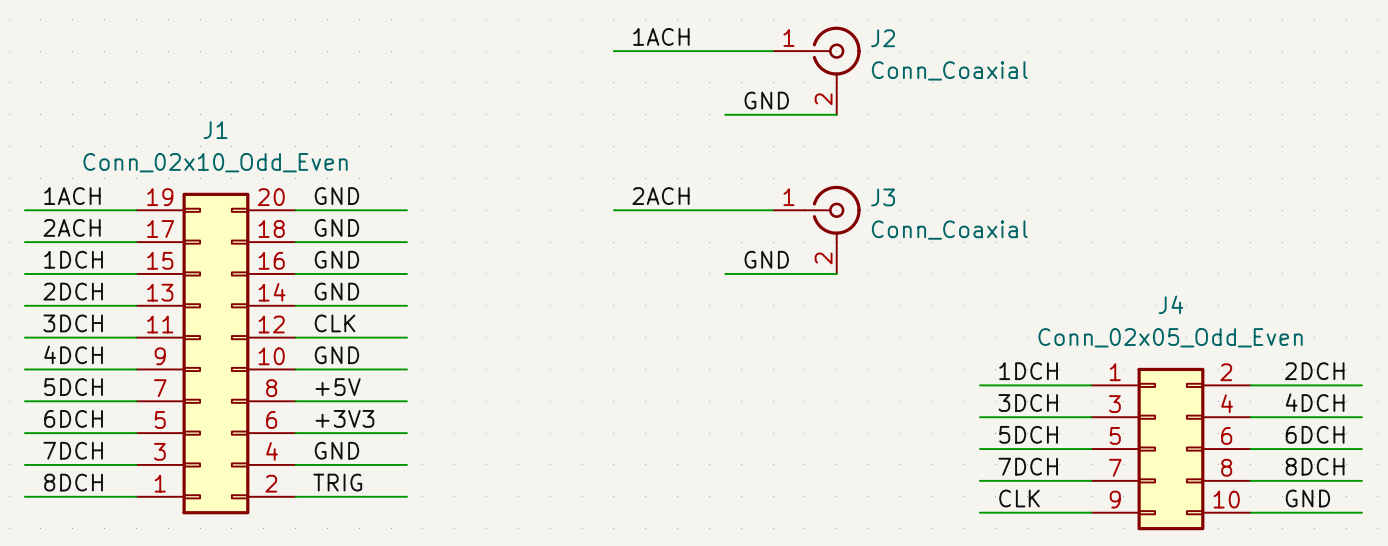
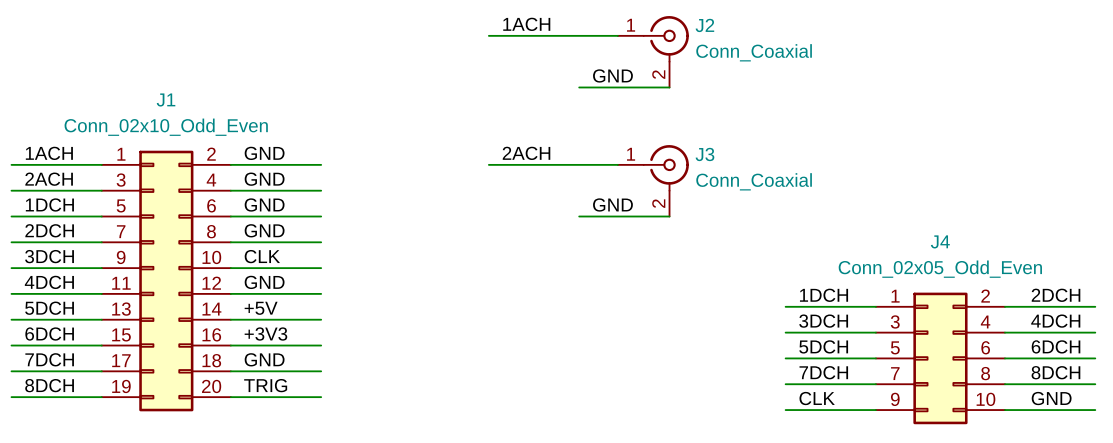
J1 flip: as is (215, 353) -> up-down (166, 281)

